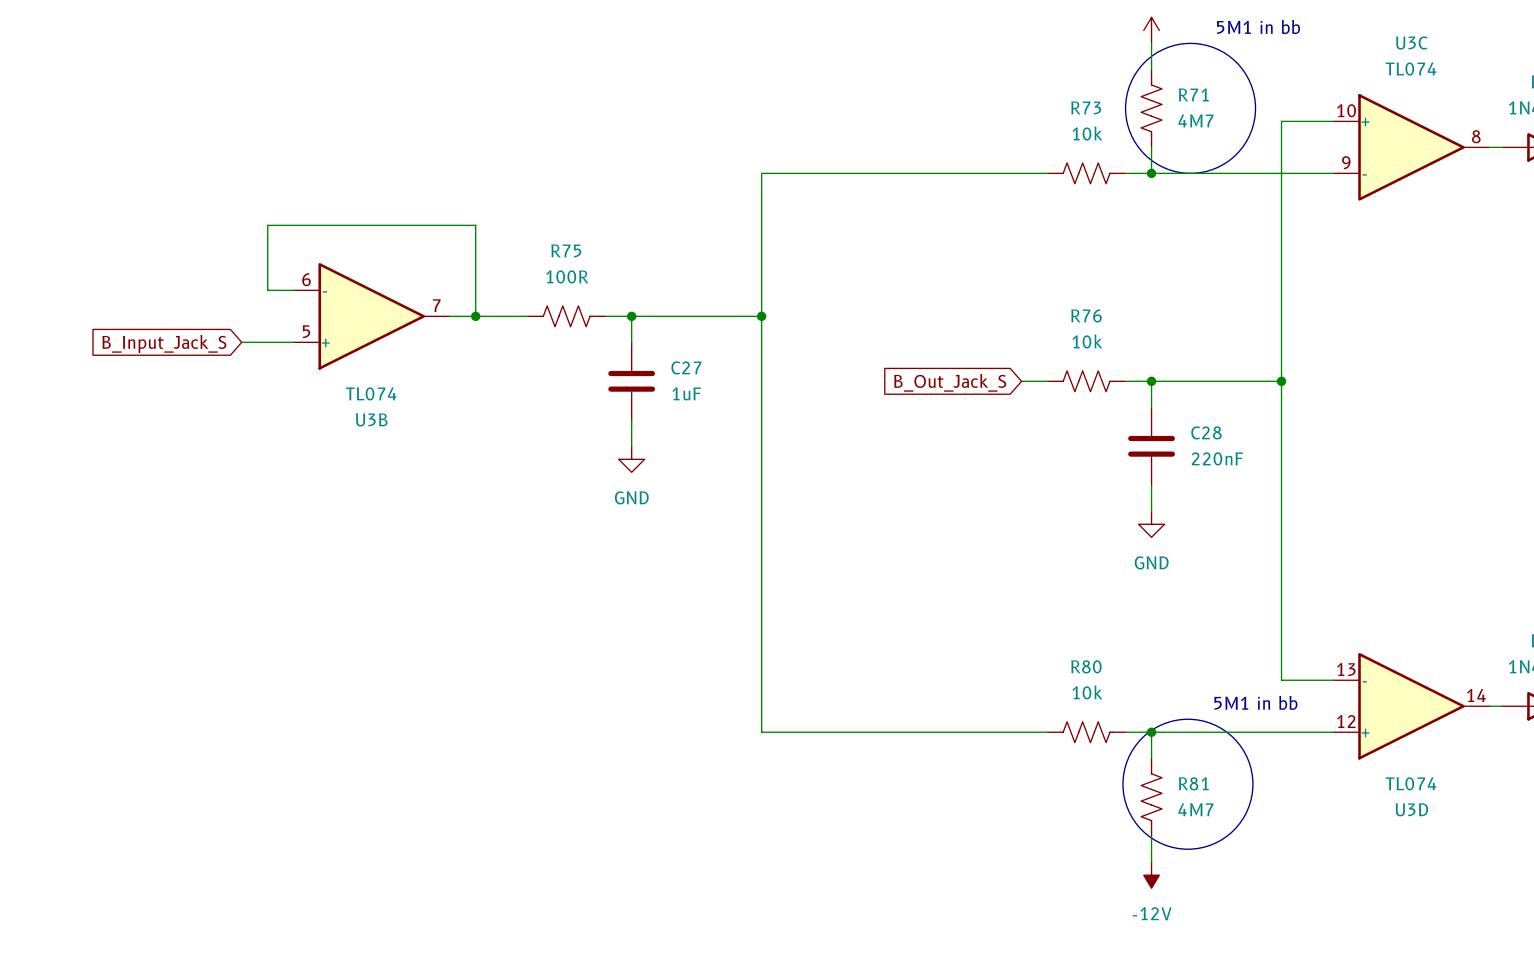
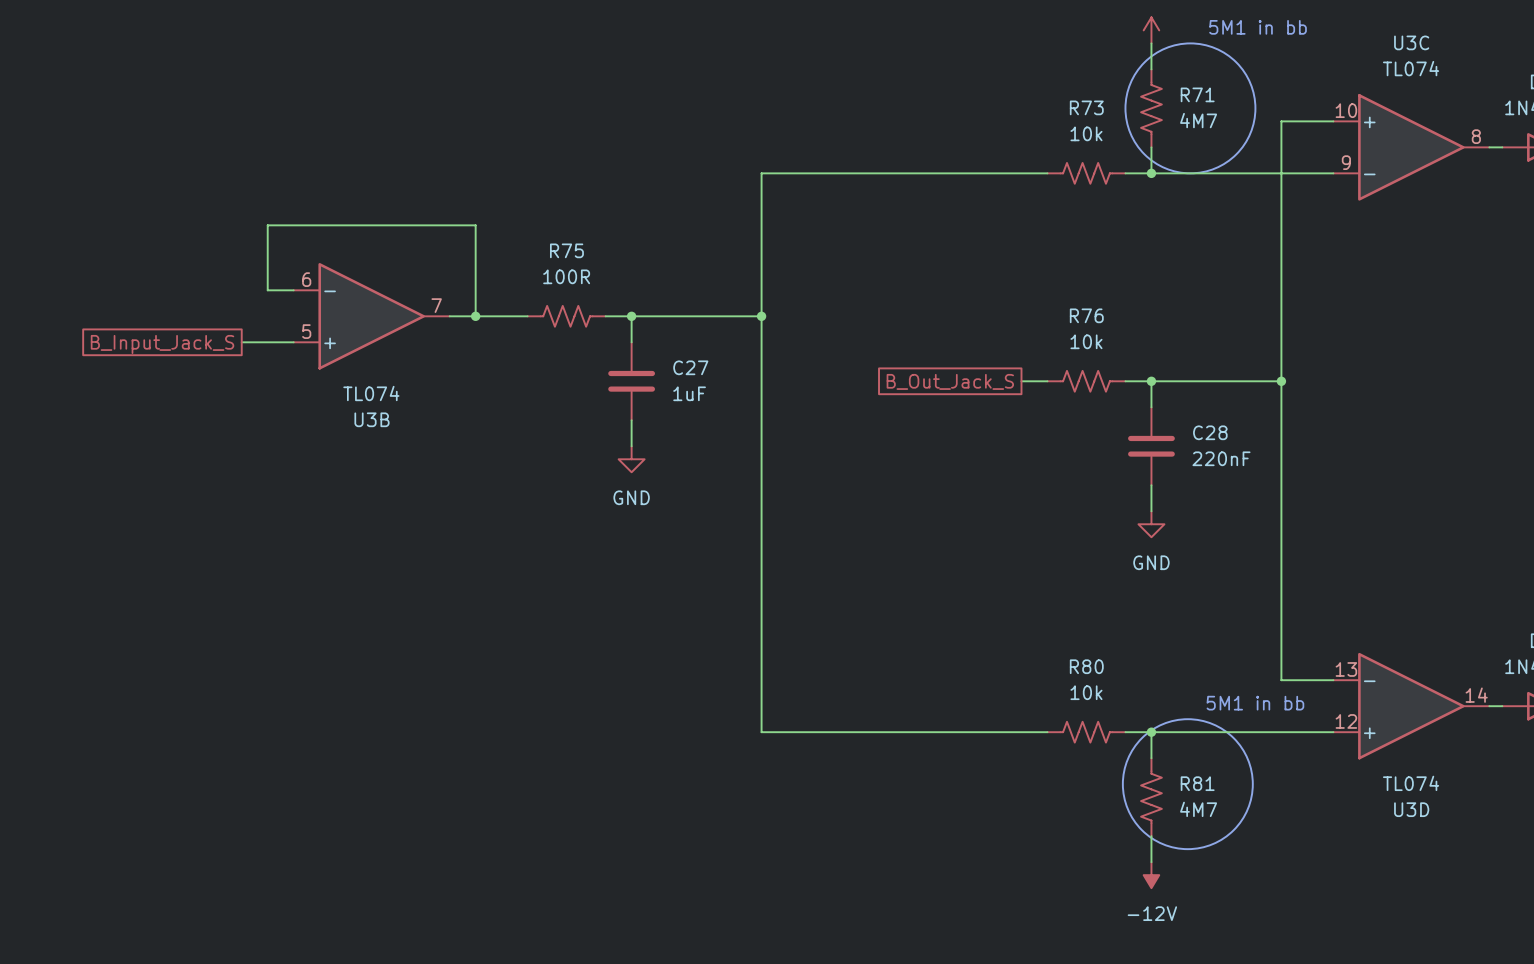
global label shape: input (164, 344) -> passive (162, 344)
global label shape: input (950, 382) -> passive (950, 381)

